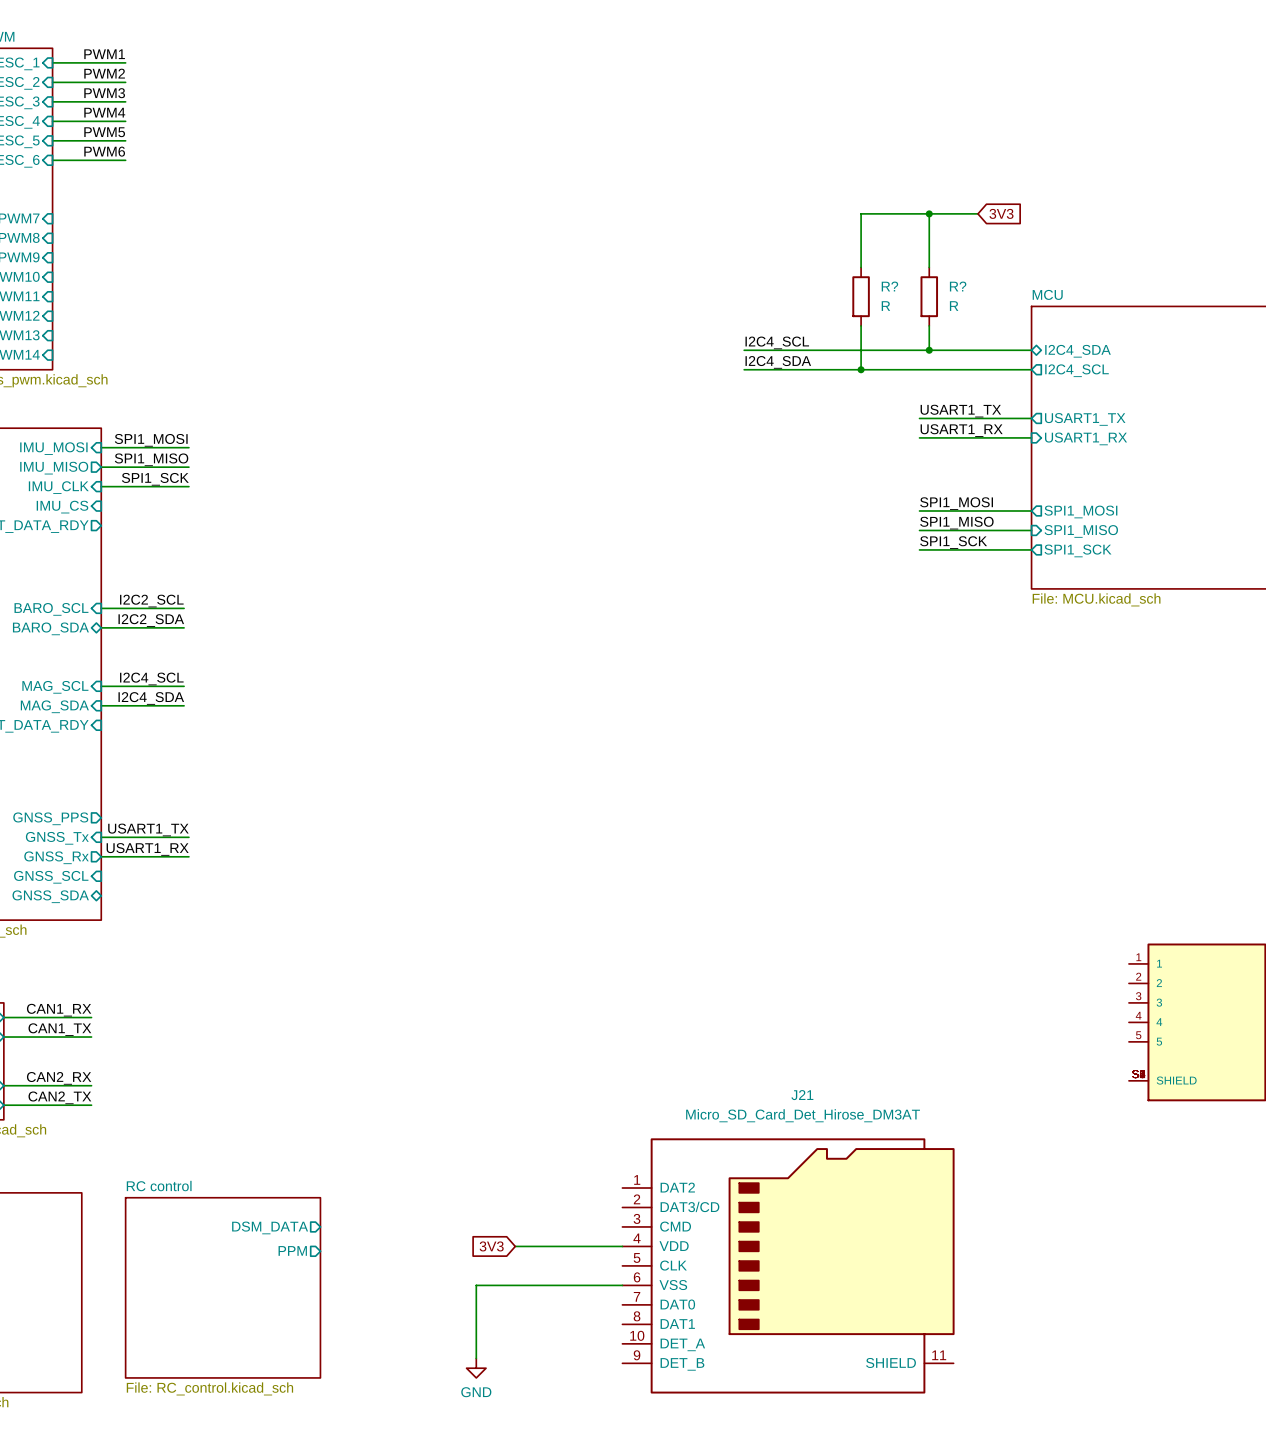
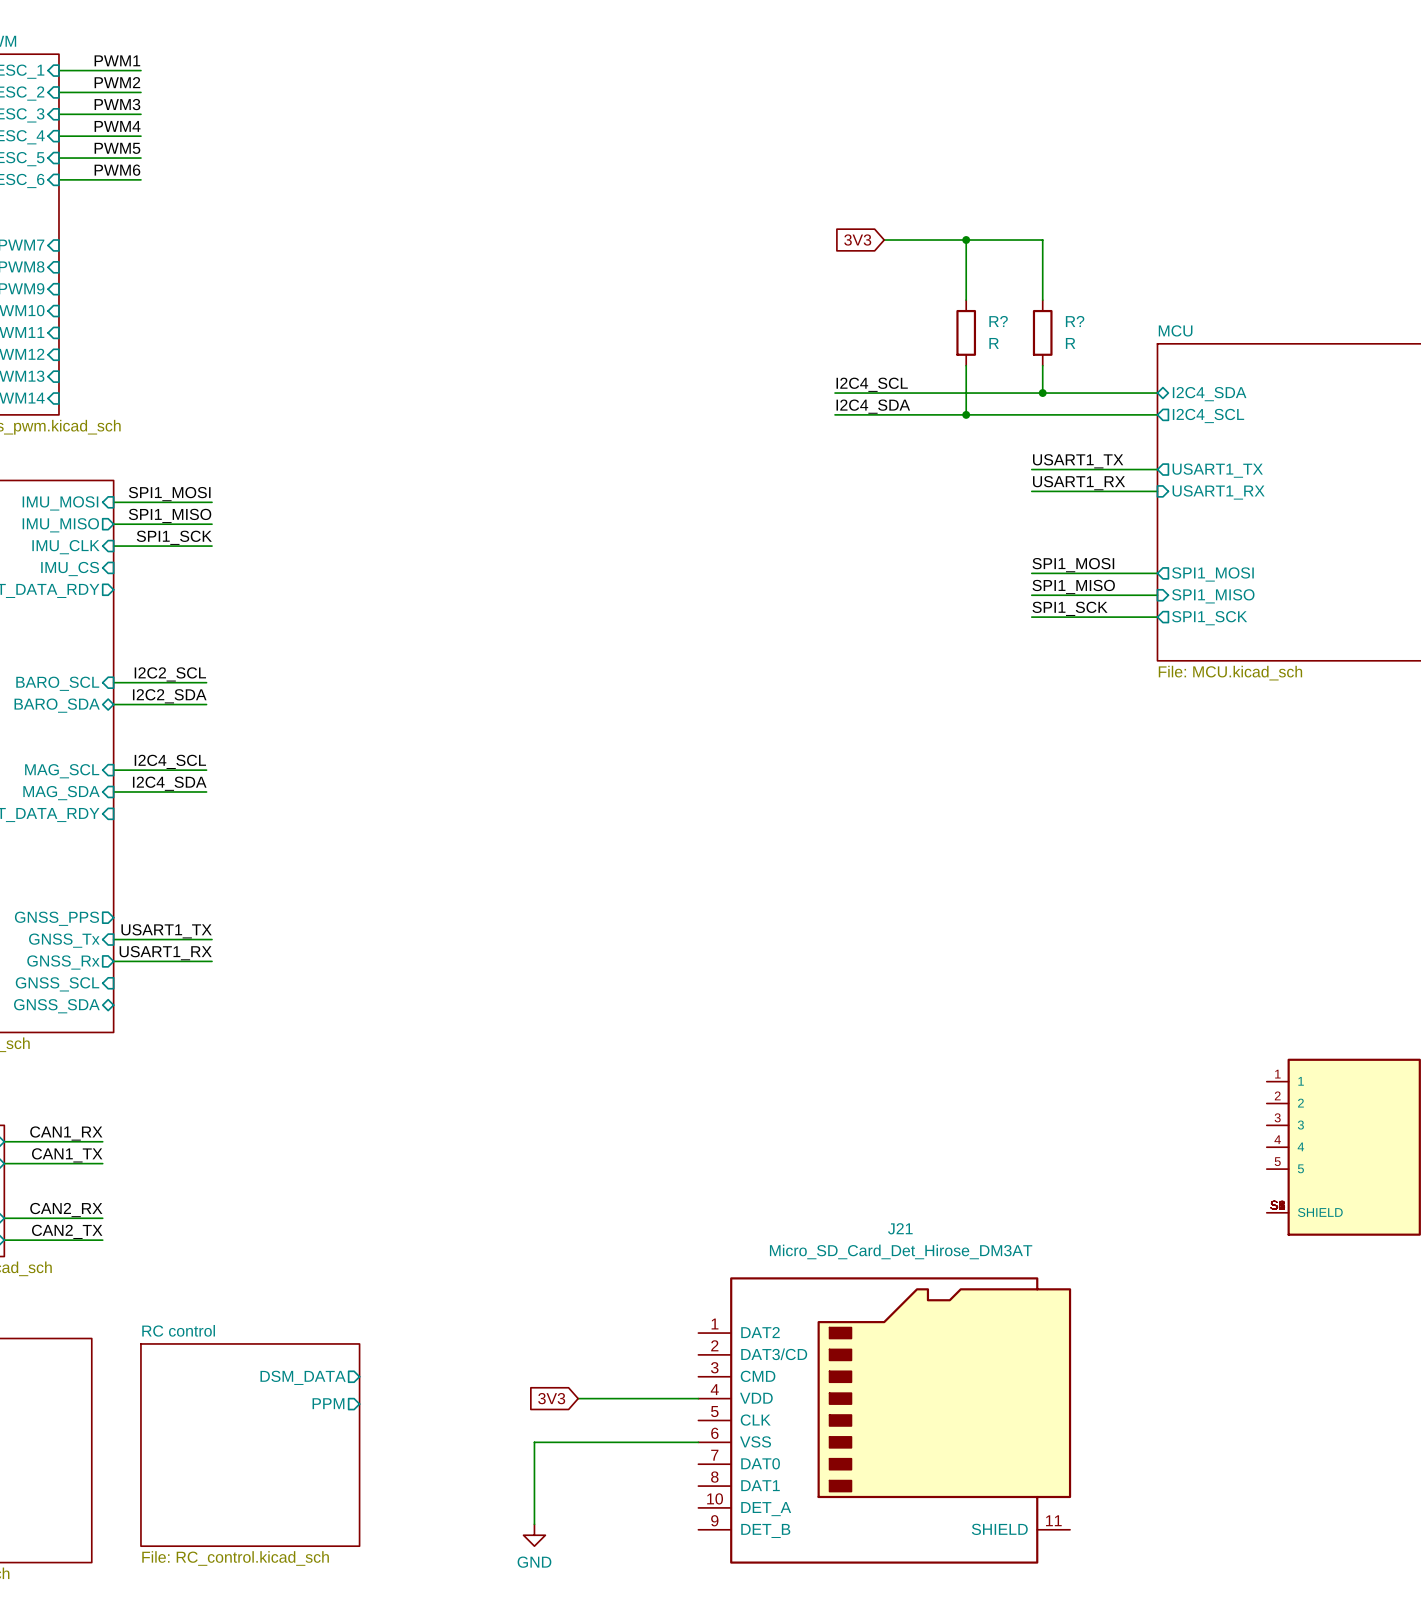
wire: none -> (884, 240) (966, 240)
junction: none -> (966, 240)
wire: (929, 213) (977, 213) -> none
junction: (929, 213) -> none
global label rotation: 0° (1001, 213) -> 180° (857, 240)
global label position: 3V3 (1001, 213) -> 3V3 (857, 240)

